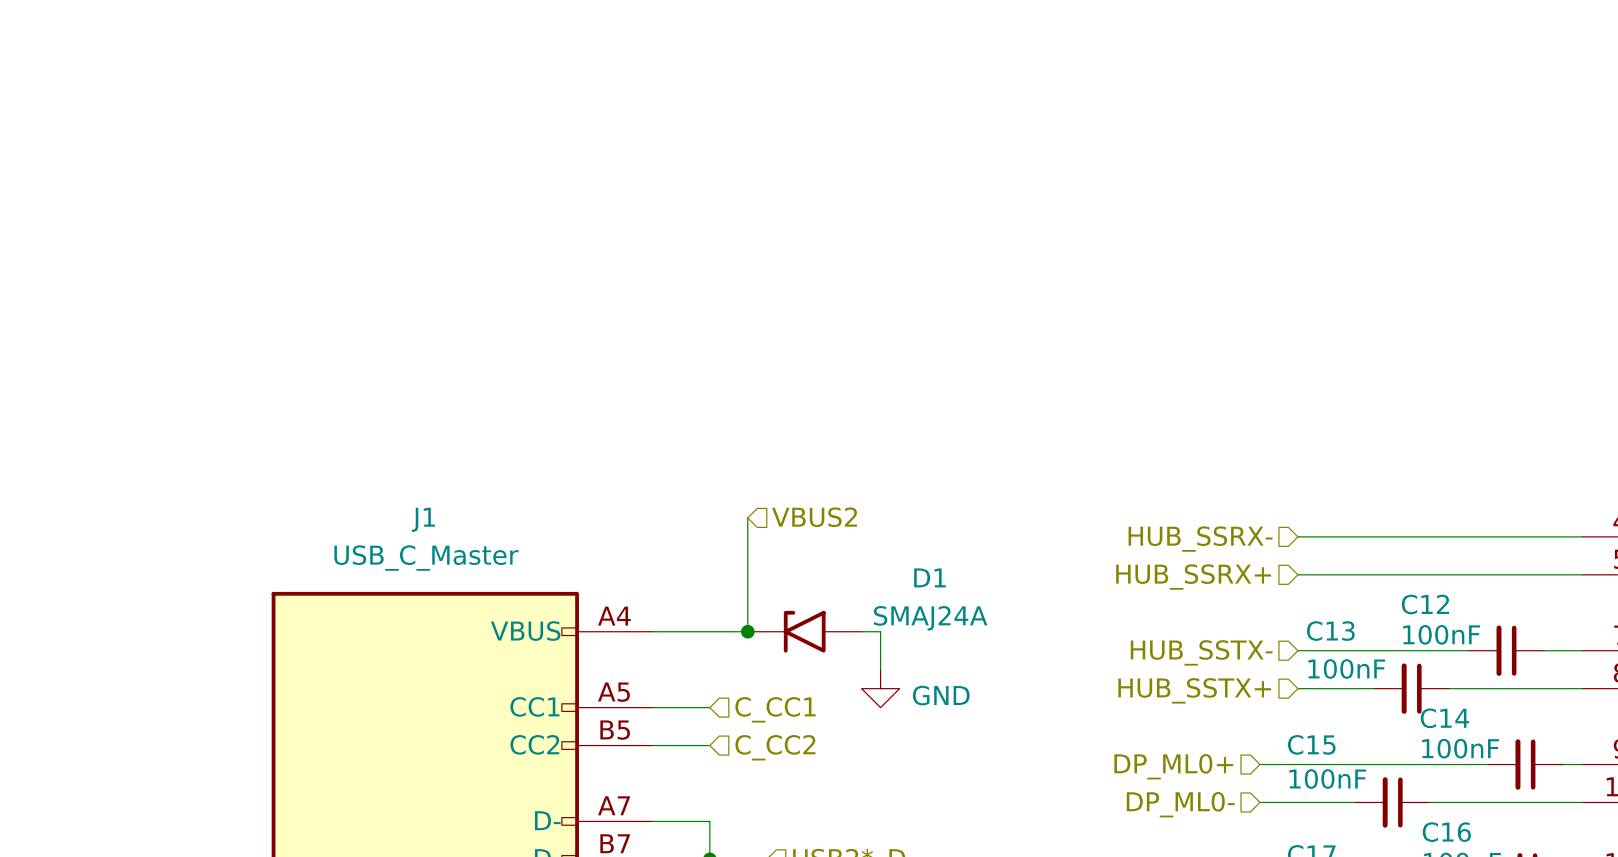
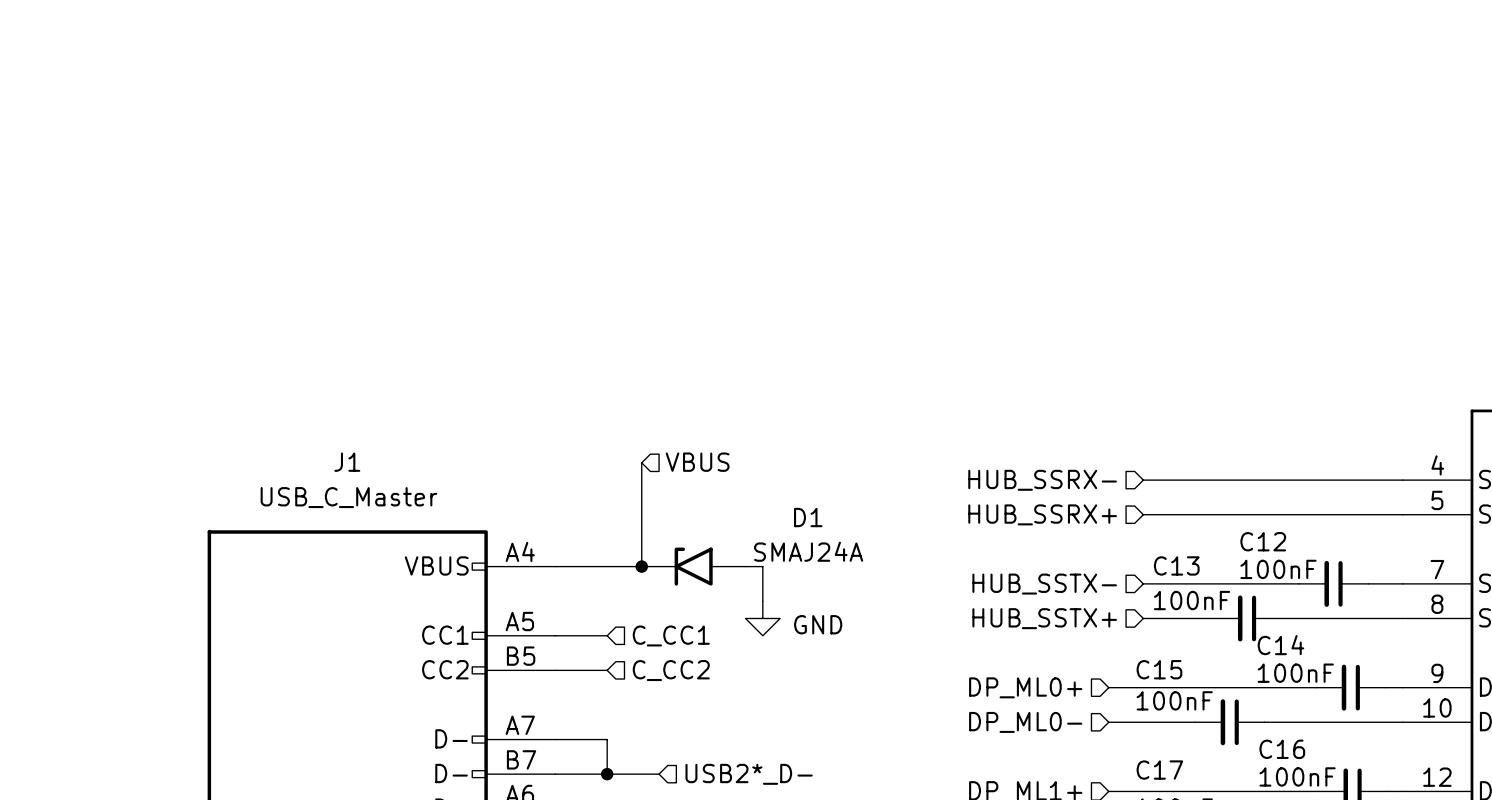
hierarchical label: VBUS2 (814, 517) -> VBUS (697, 462)

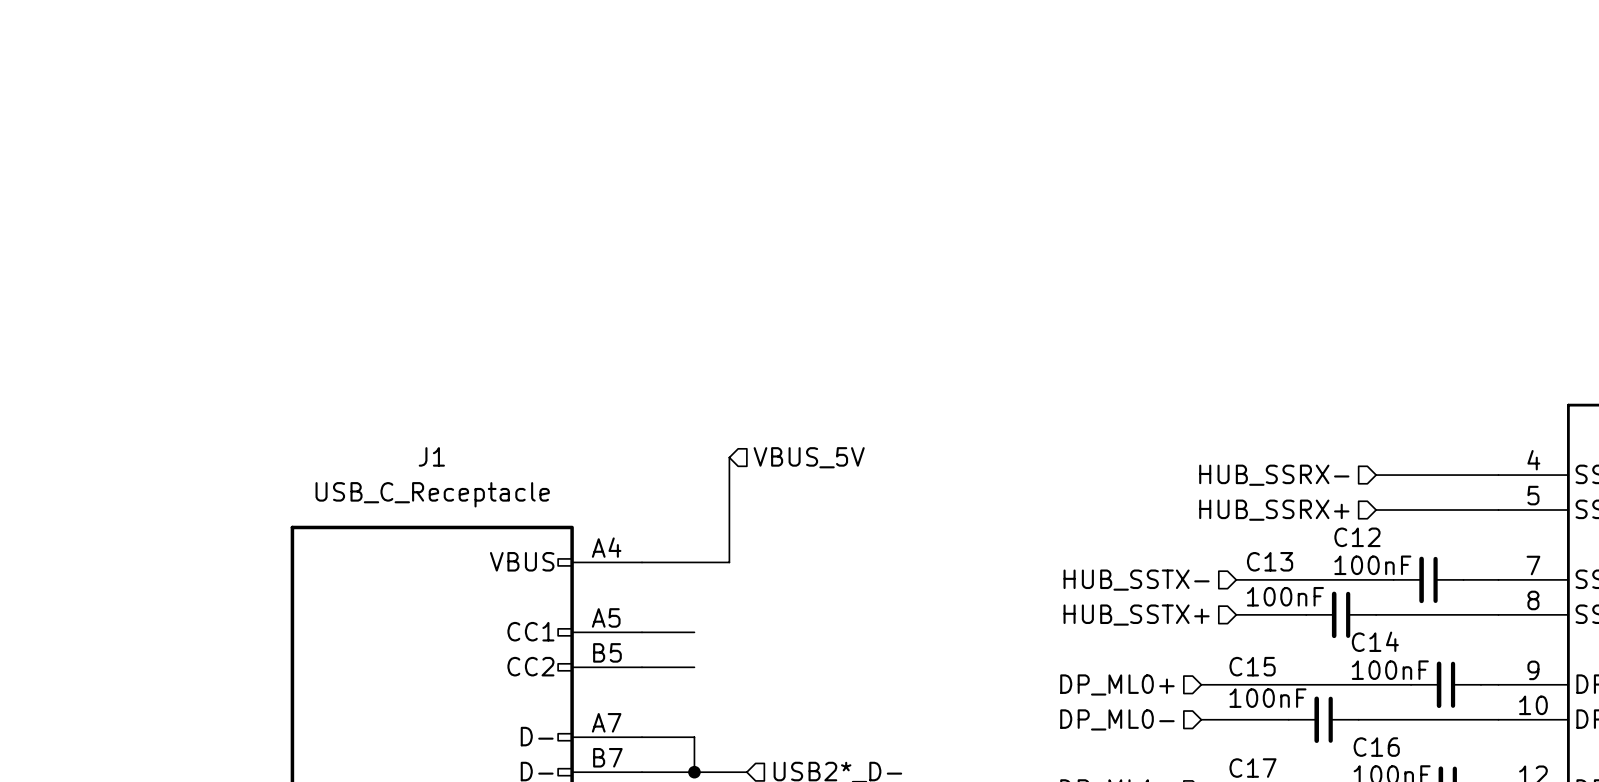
hierarchical label: VBUS (697, 462) -> VBUS_5V (809, 457)
hierarchical label position: HUB_SSRX- (1042, 480) -> HUB_SSRX- (1274, 475)
wire: (1143, 480) (1281, 480) -> none
J1 value: USB_C_Master (348, 497) -> USB_C_Receptacle (432, 494)
hierarchical label position: HUB_SSRX+ (1042, 514) -> HUB_SSRX+ (1274, 510)
wire: (1143, 514) (1281, 514) -> none
junction: (641, 566) -> none
D1: SMAJ24A (693, 566) -> none
wire: (745, 566) (762, 566) (762, 601) -> none
power symbol: GND (762, 618) -> none
hierarchical label: C_CC1 (671, 635) -> none
hierarchical label: C_CC2 (671, 670) -> none

